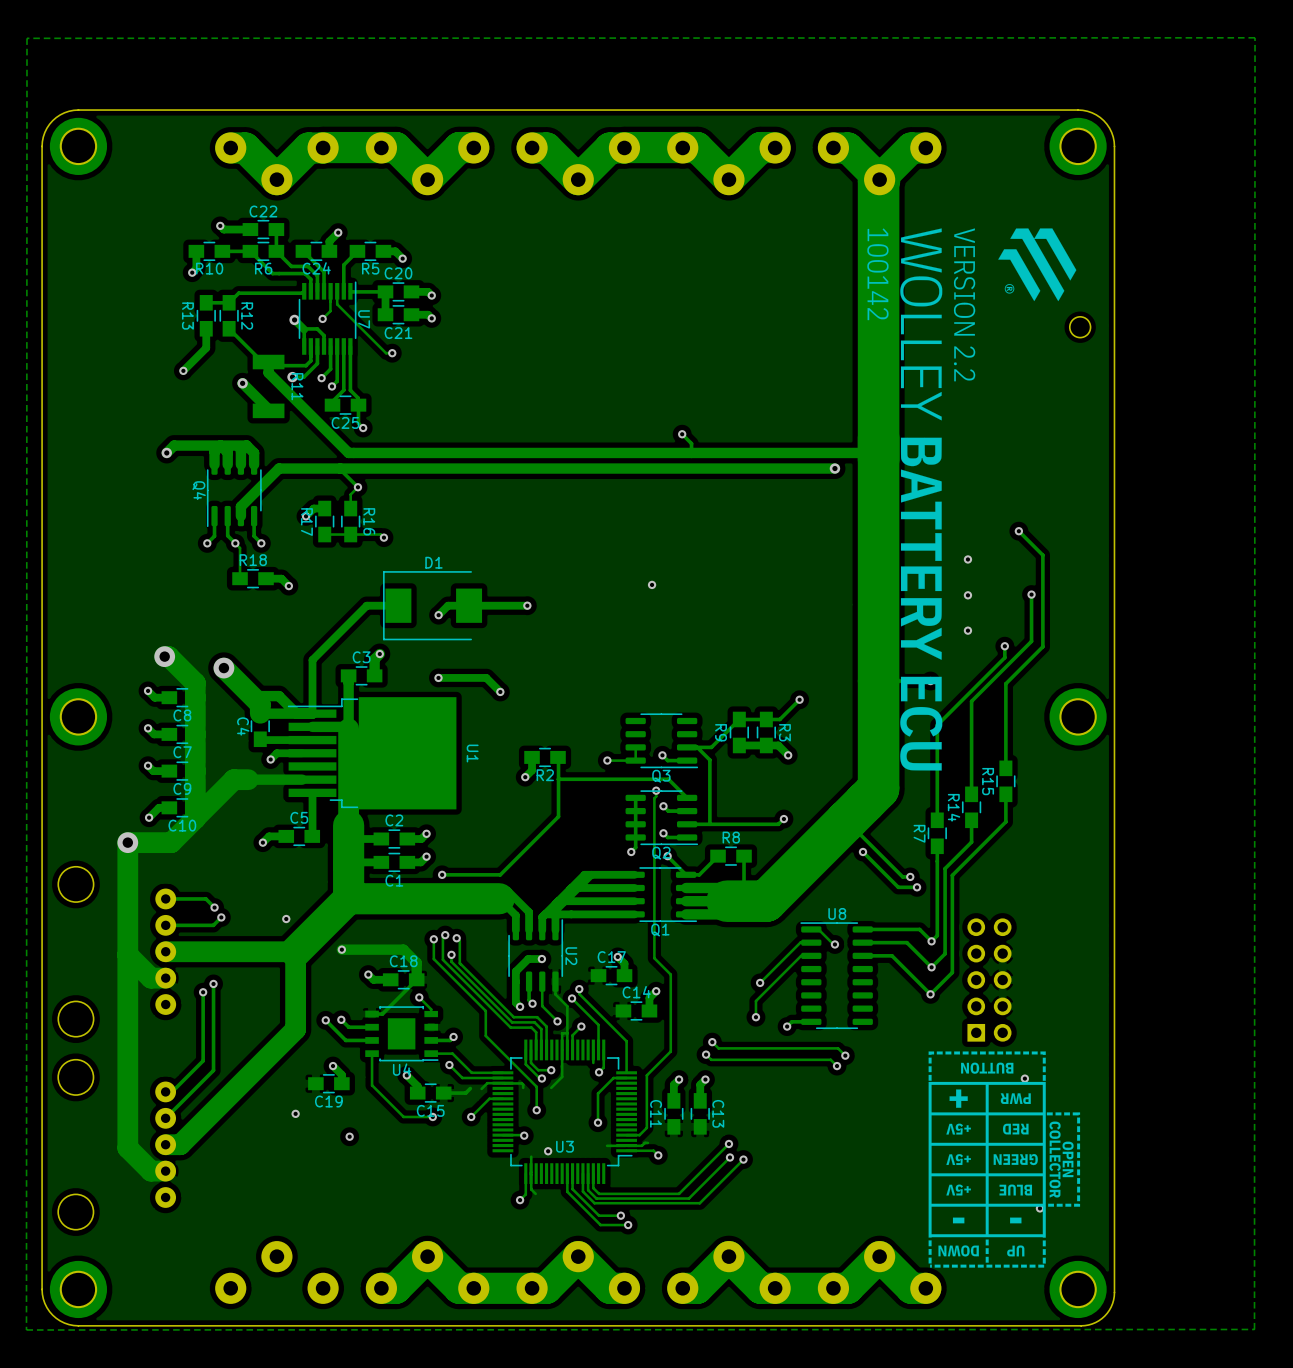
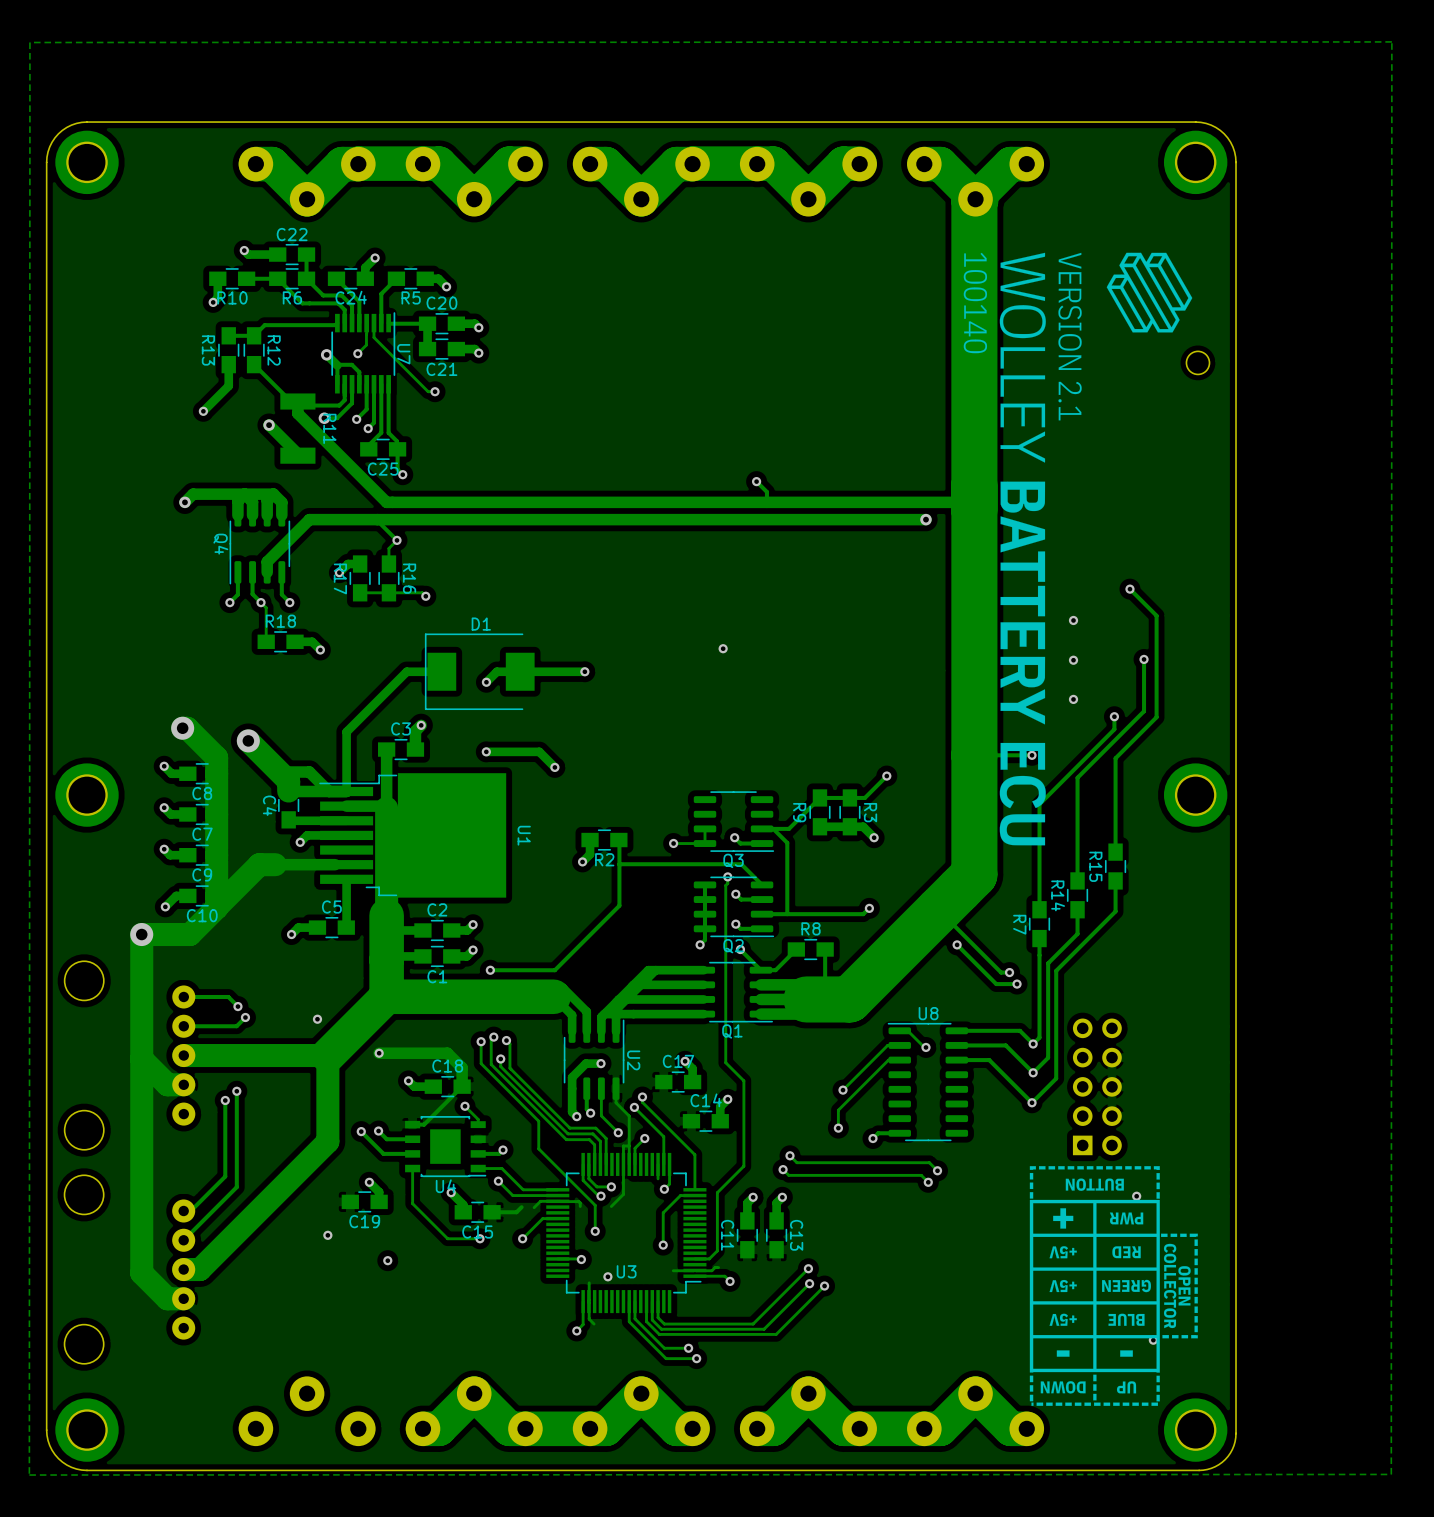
drawing shape: [867, 228, 1077, 771] -> [963, 252, 1193, 846]

